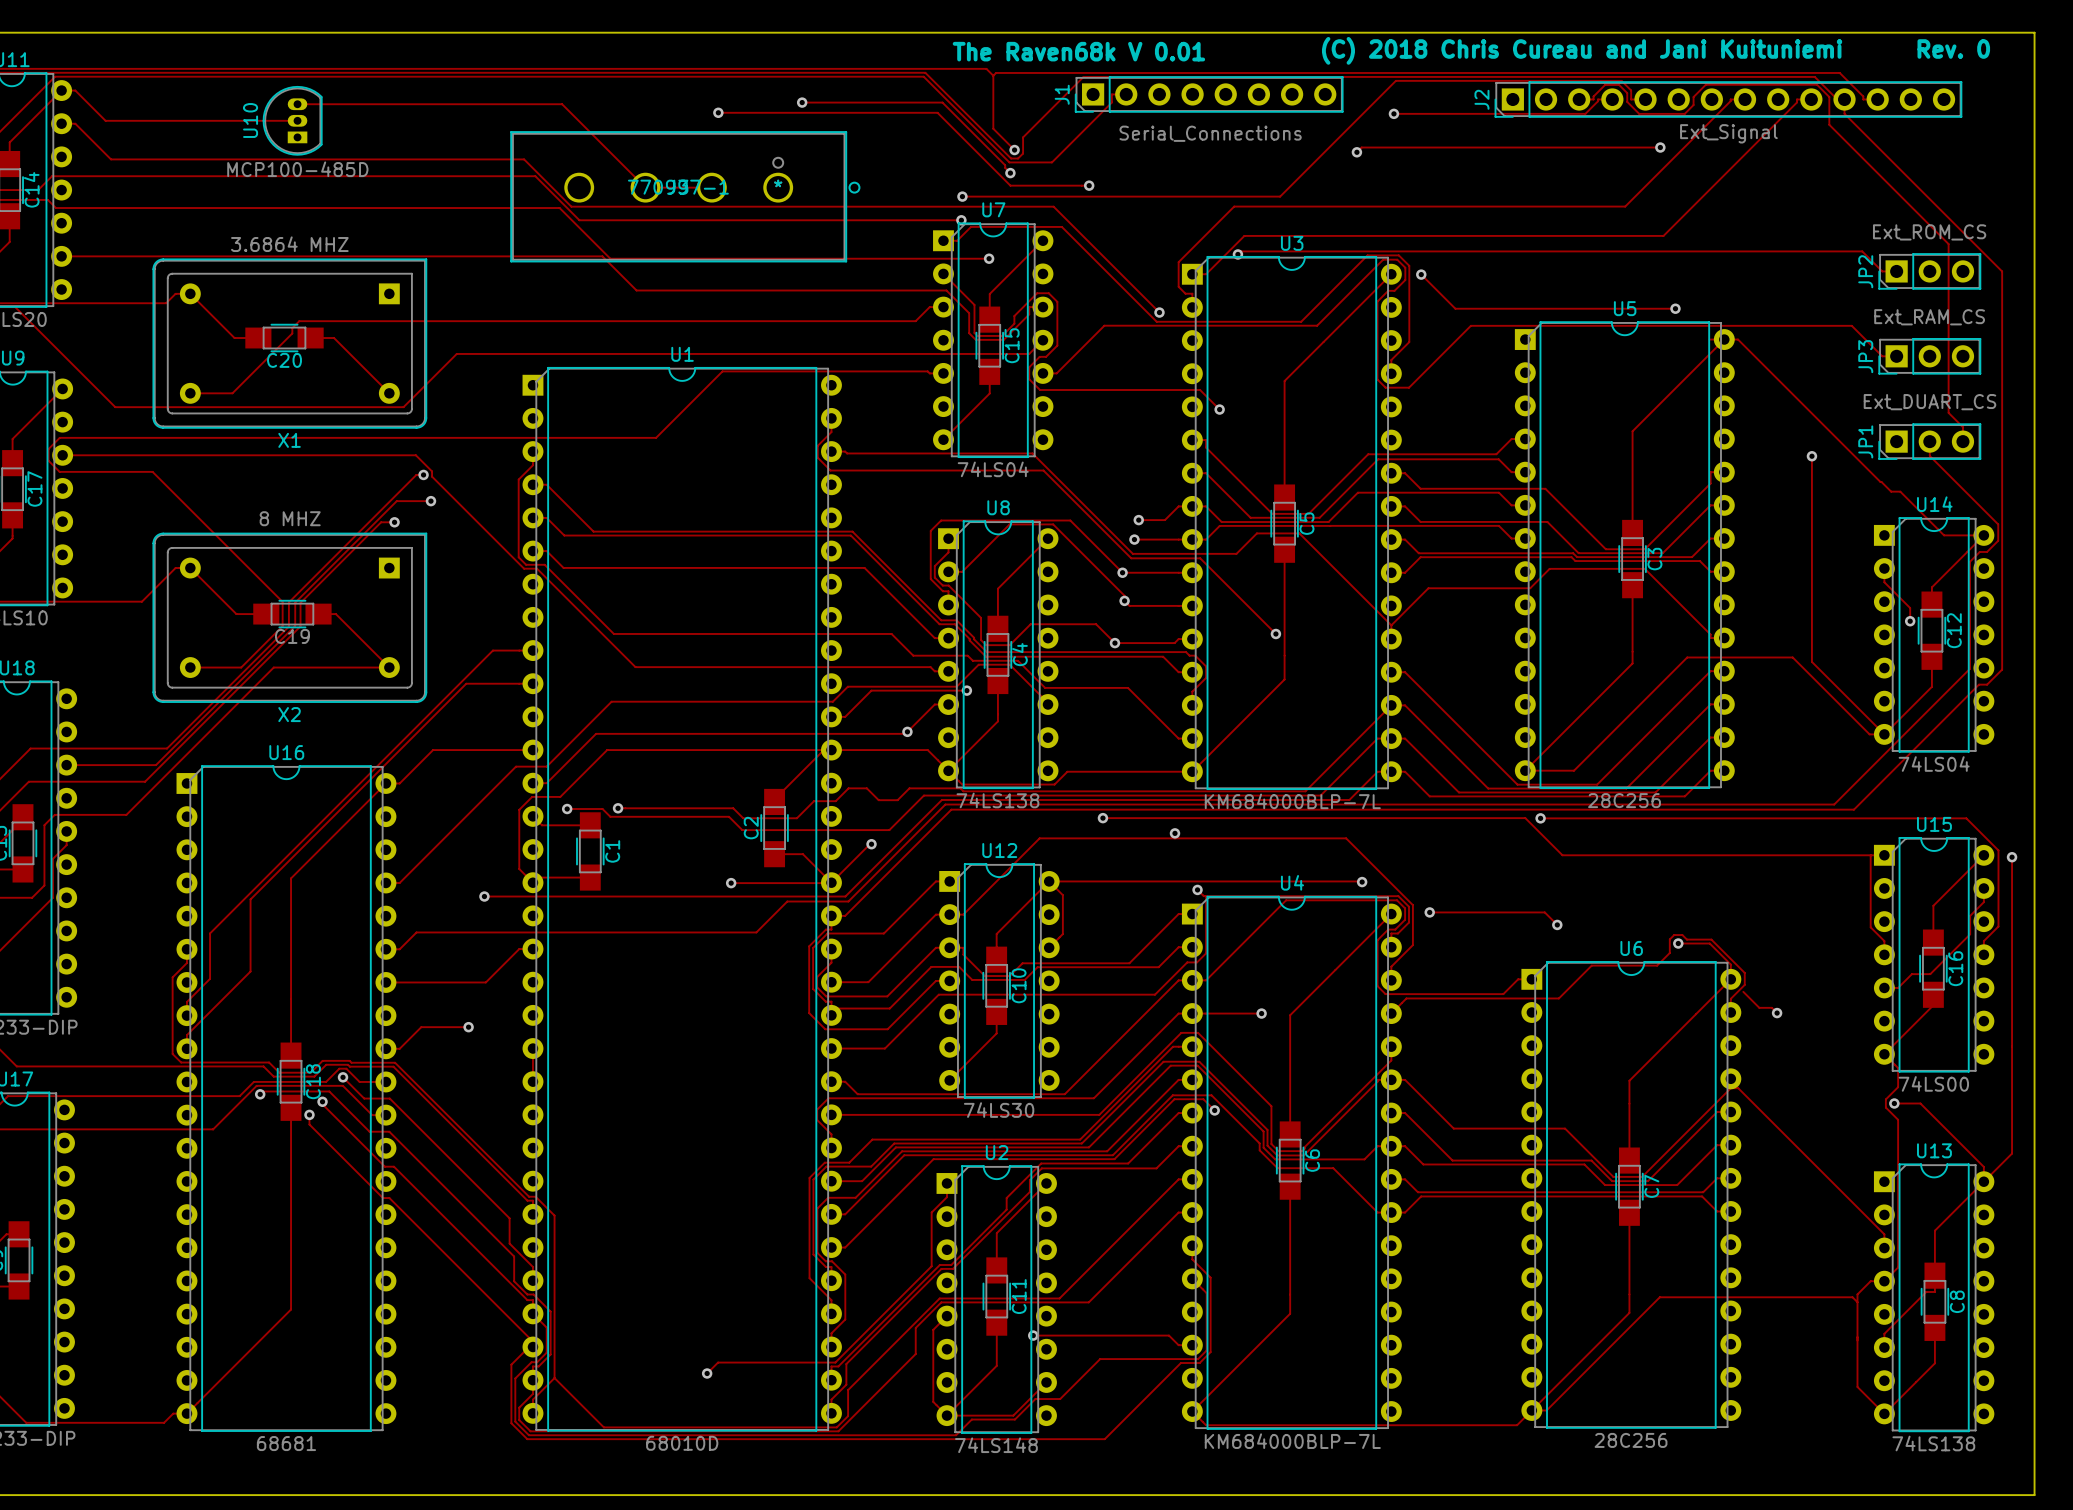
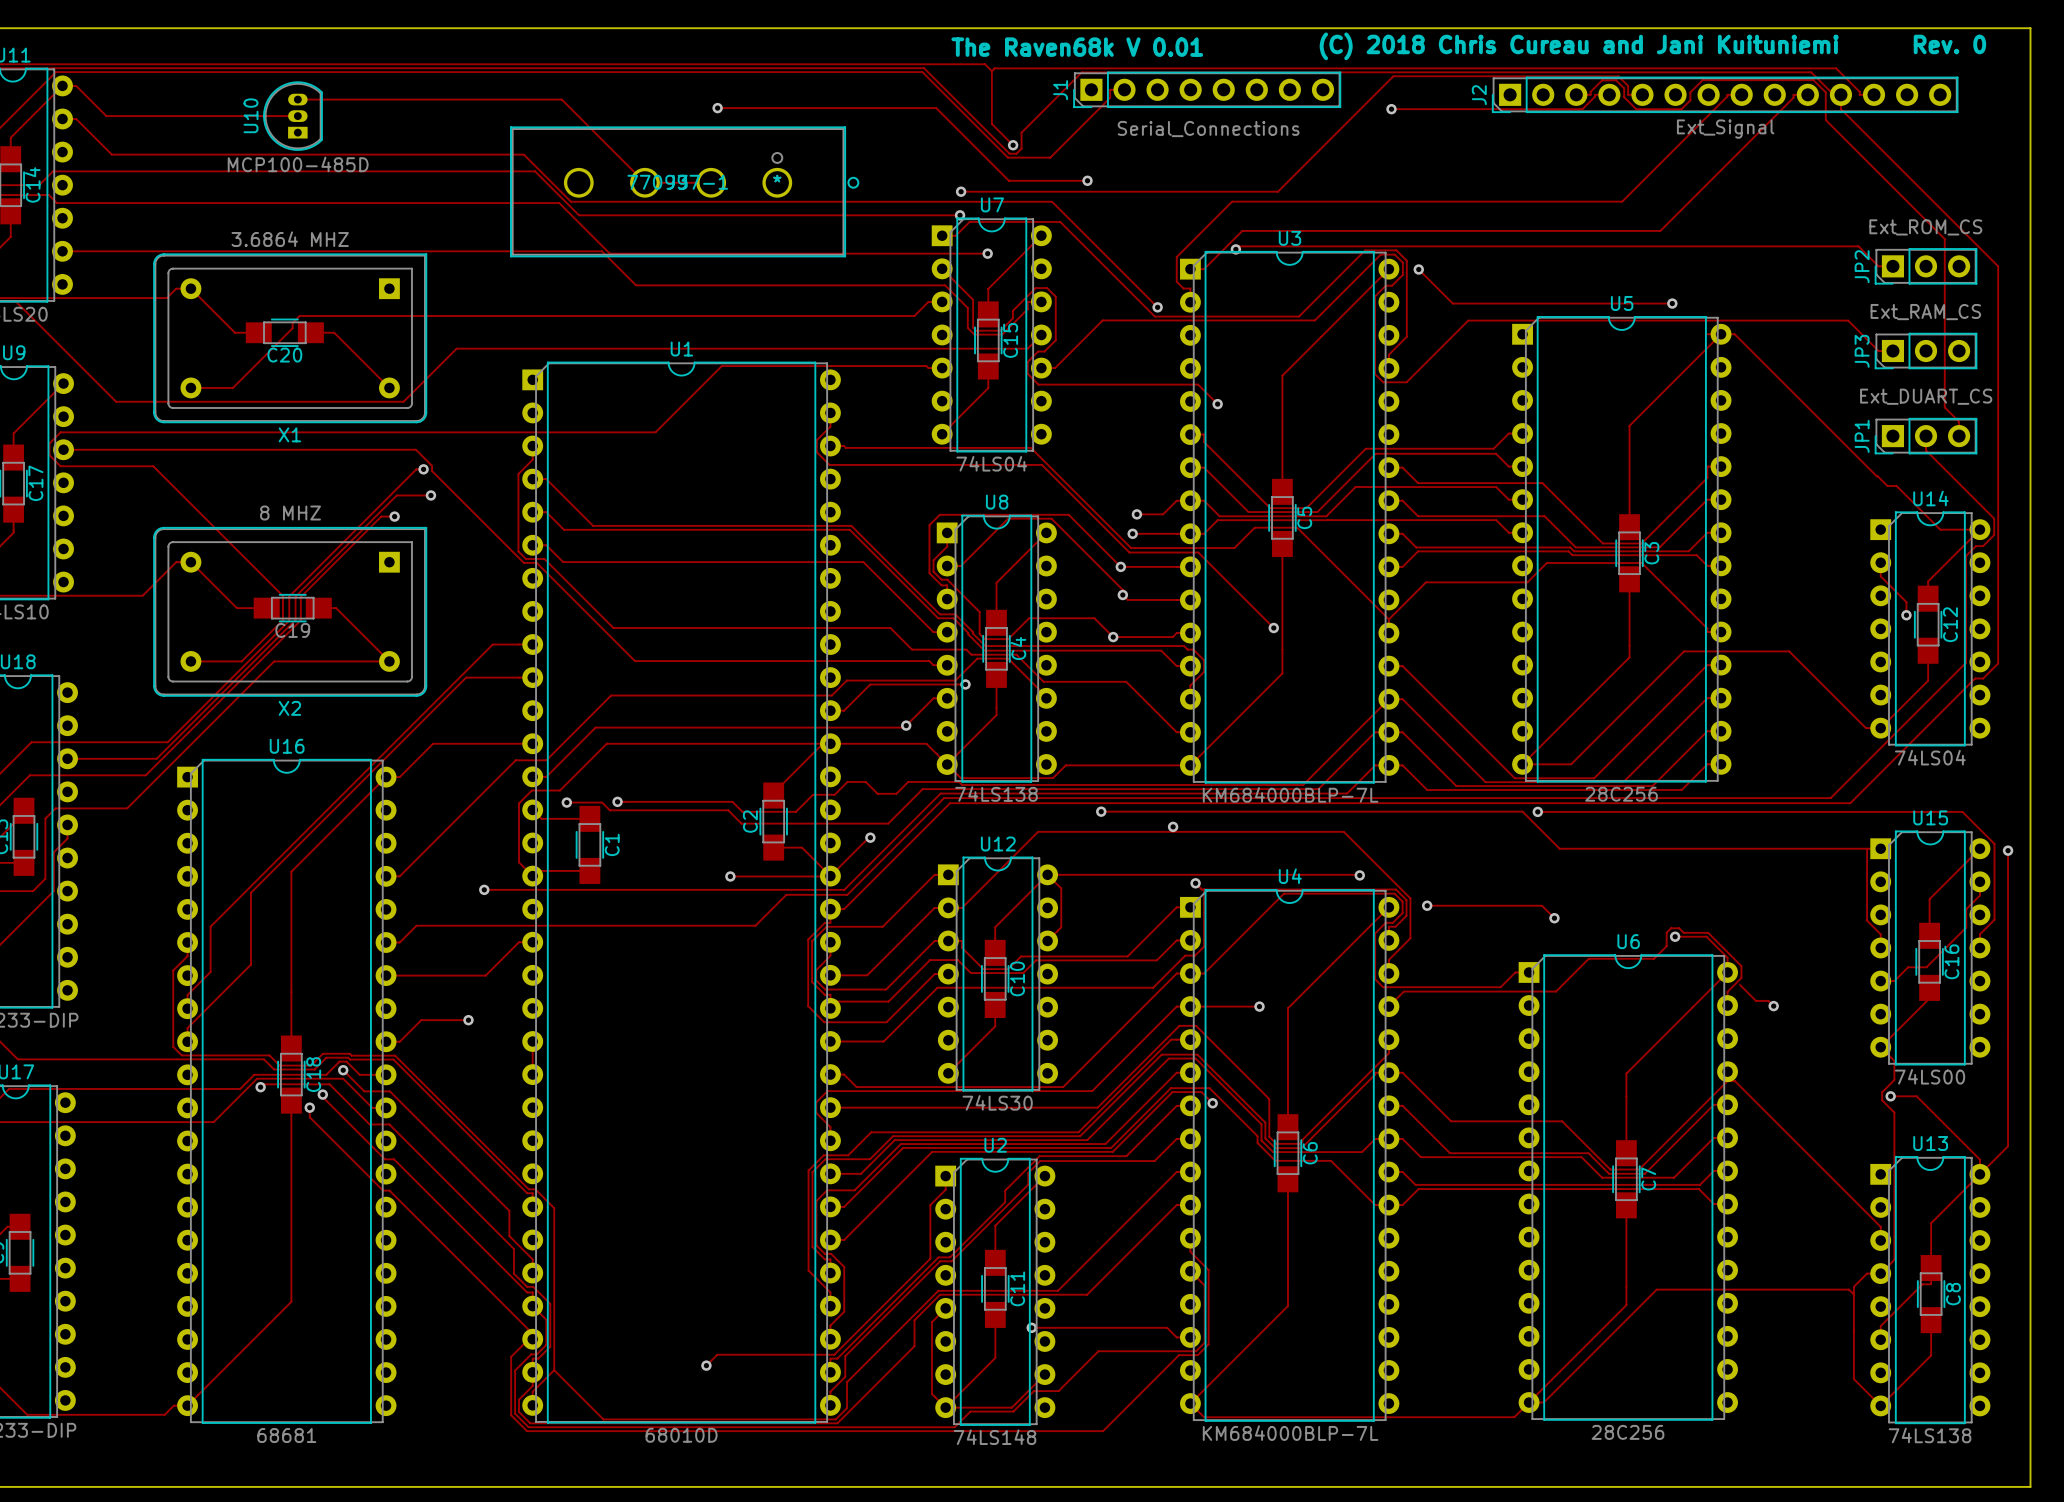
track: (802, 102) (942, 102) (1005, 165) (1010, 173) -> none
via: (802, 102) -> none
track: (1660, 147) (1361, 147) (1356, 152) -> none
via: (1660, 147) -> none
via: (1356, 152) -> none
via: (1010, 173) -> none
track: (1811, 456) (1811, 661) (1884, 734) -> none
via: (1811, 456) -> none

